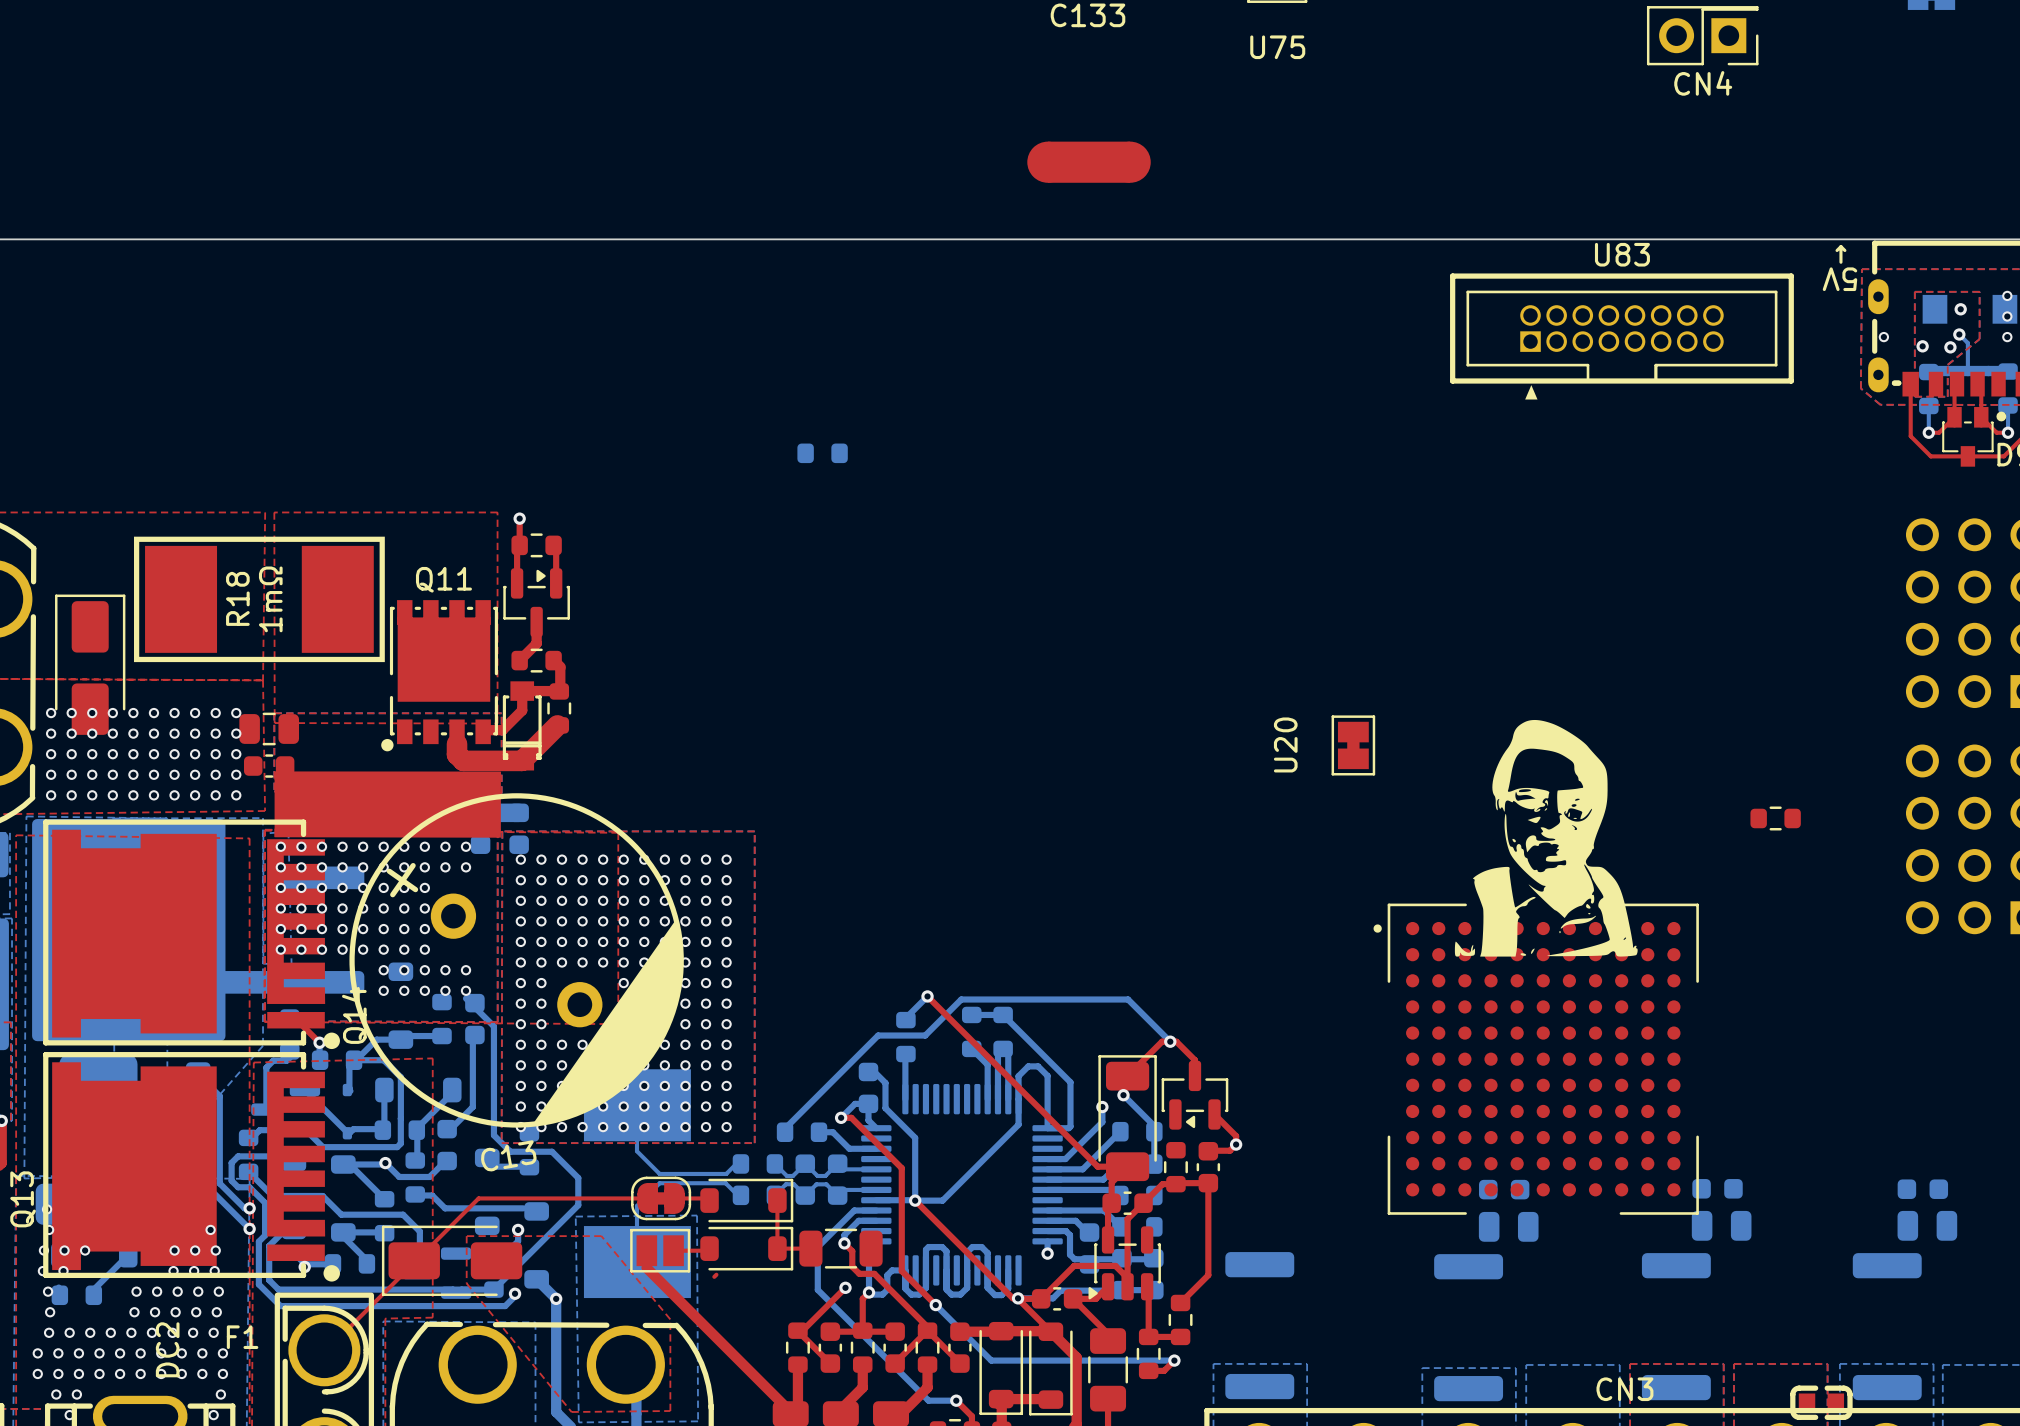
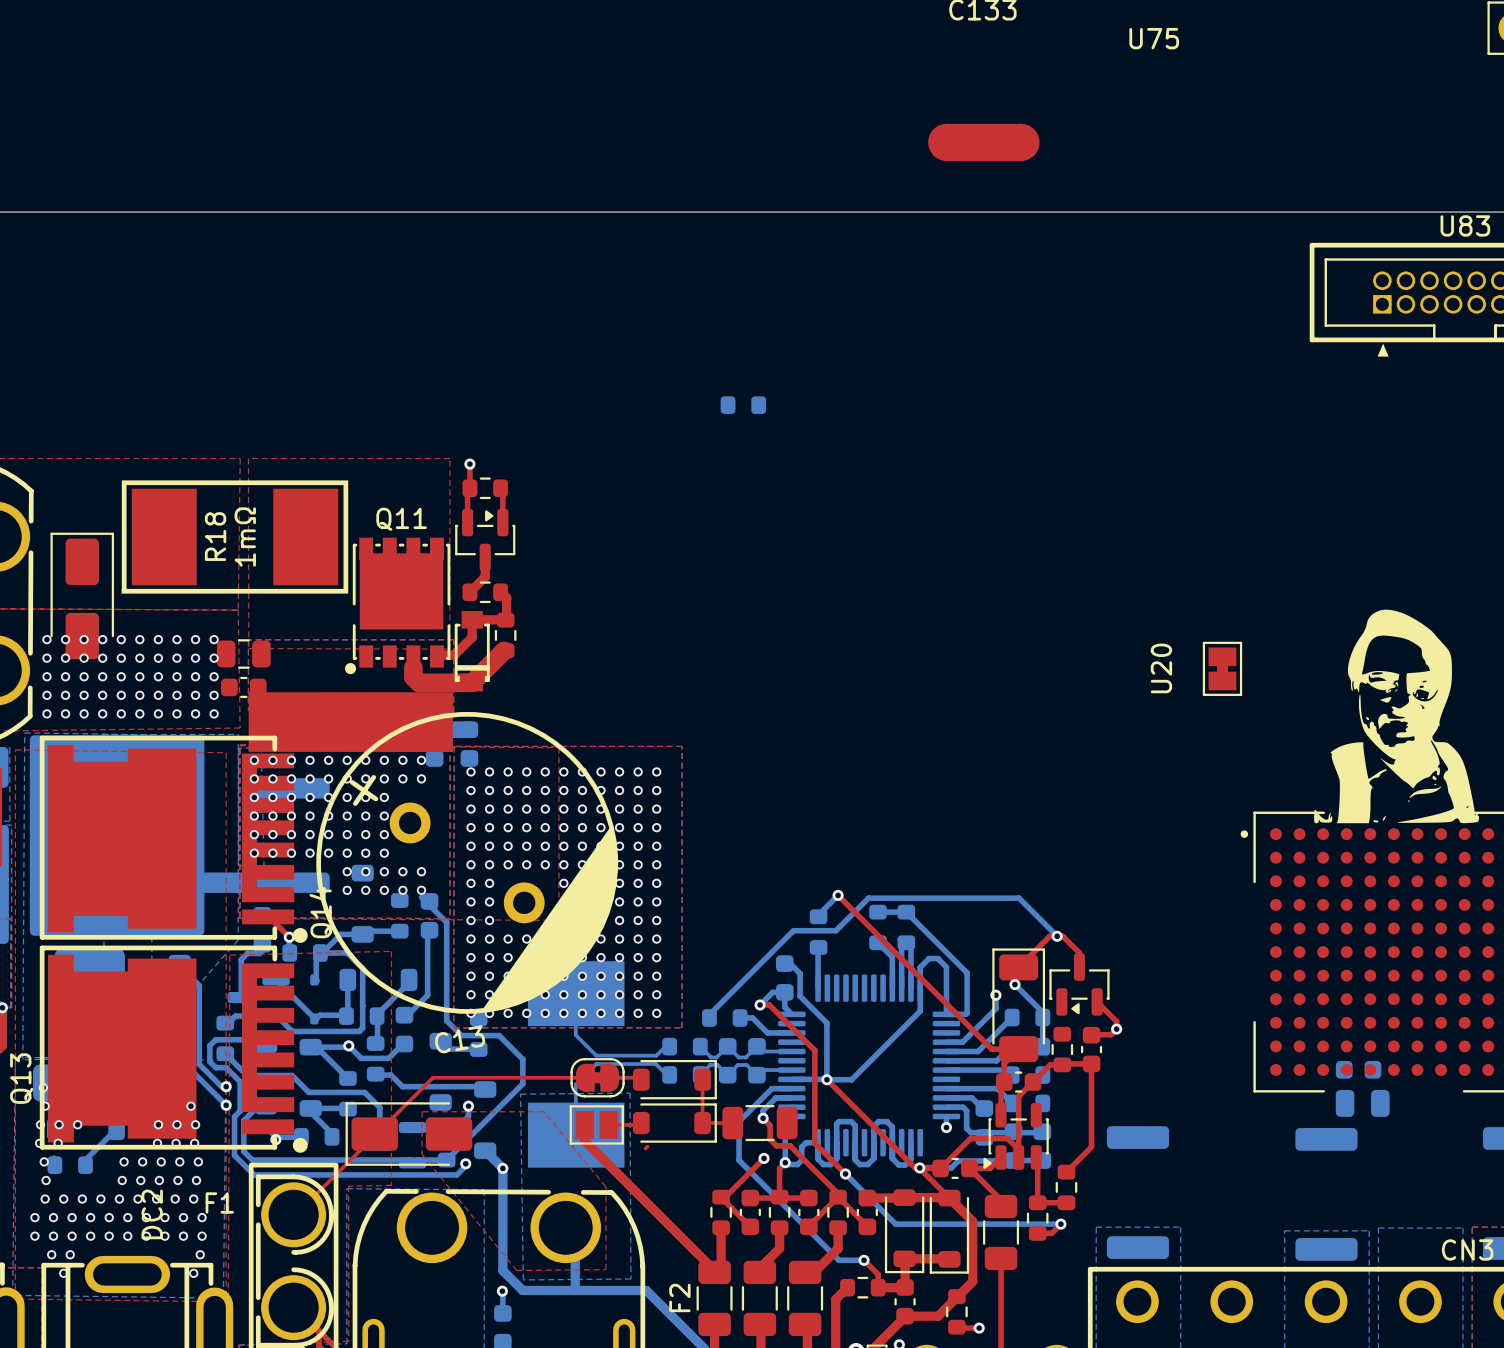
drawing position: (1546, 838) -> (1396, 716)

